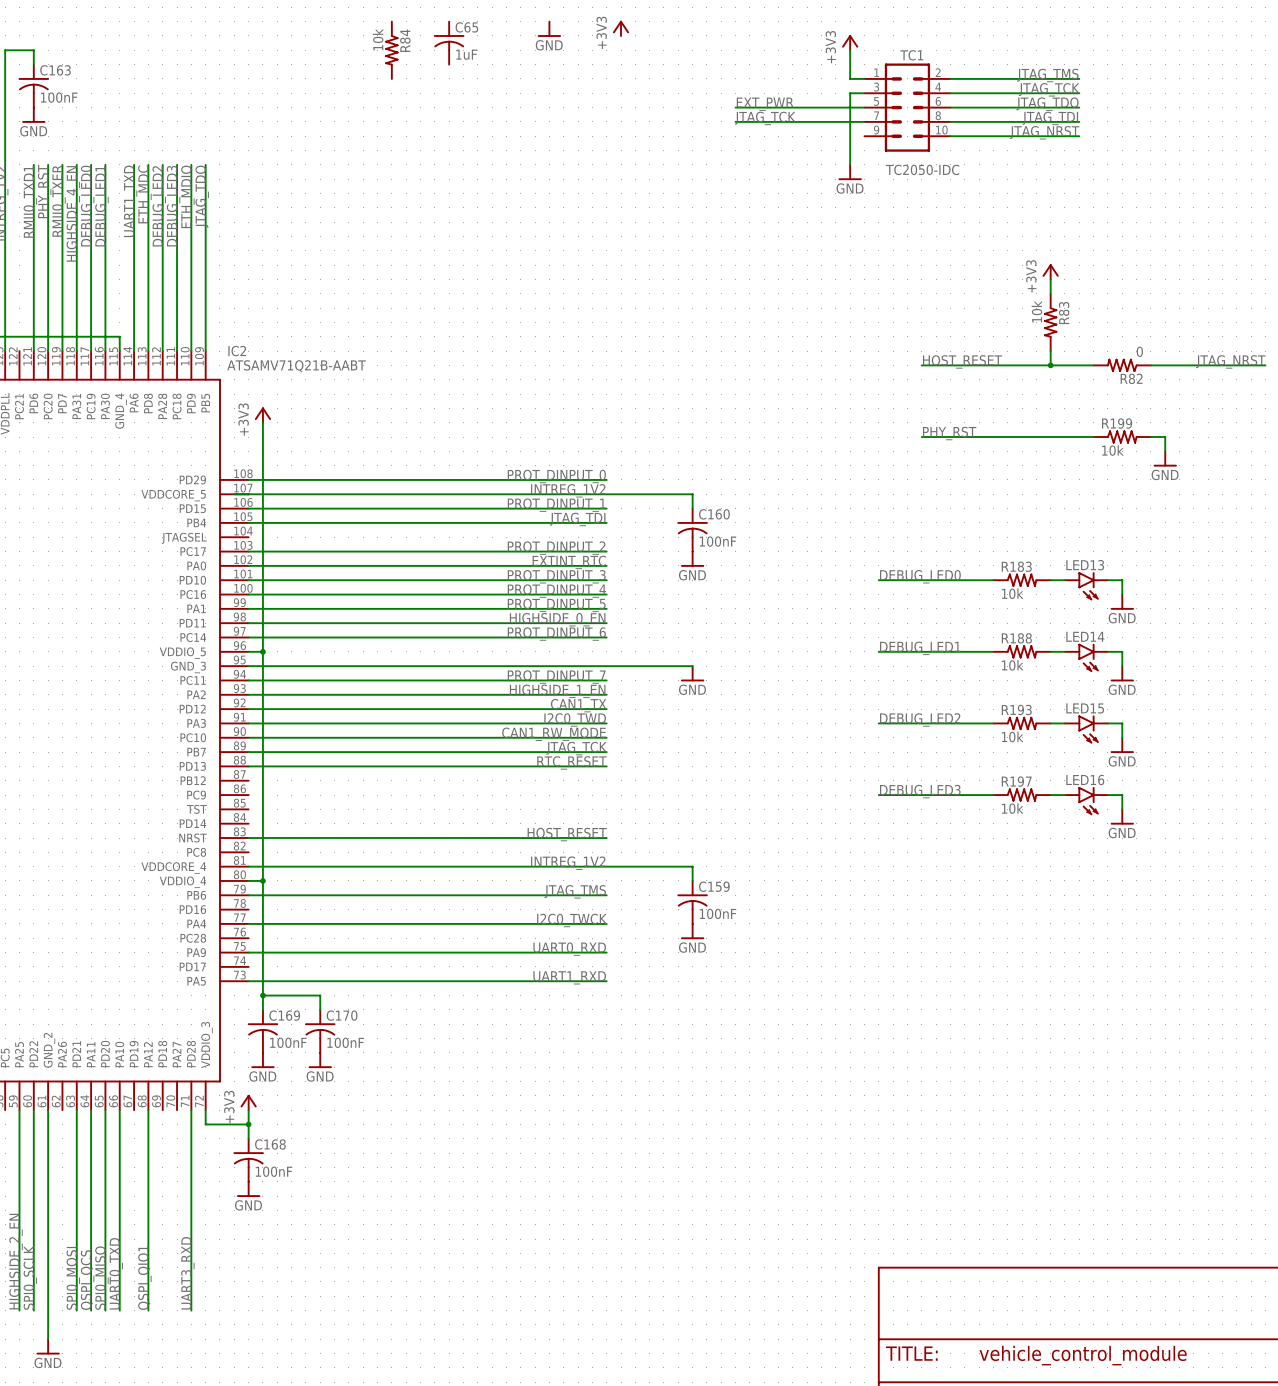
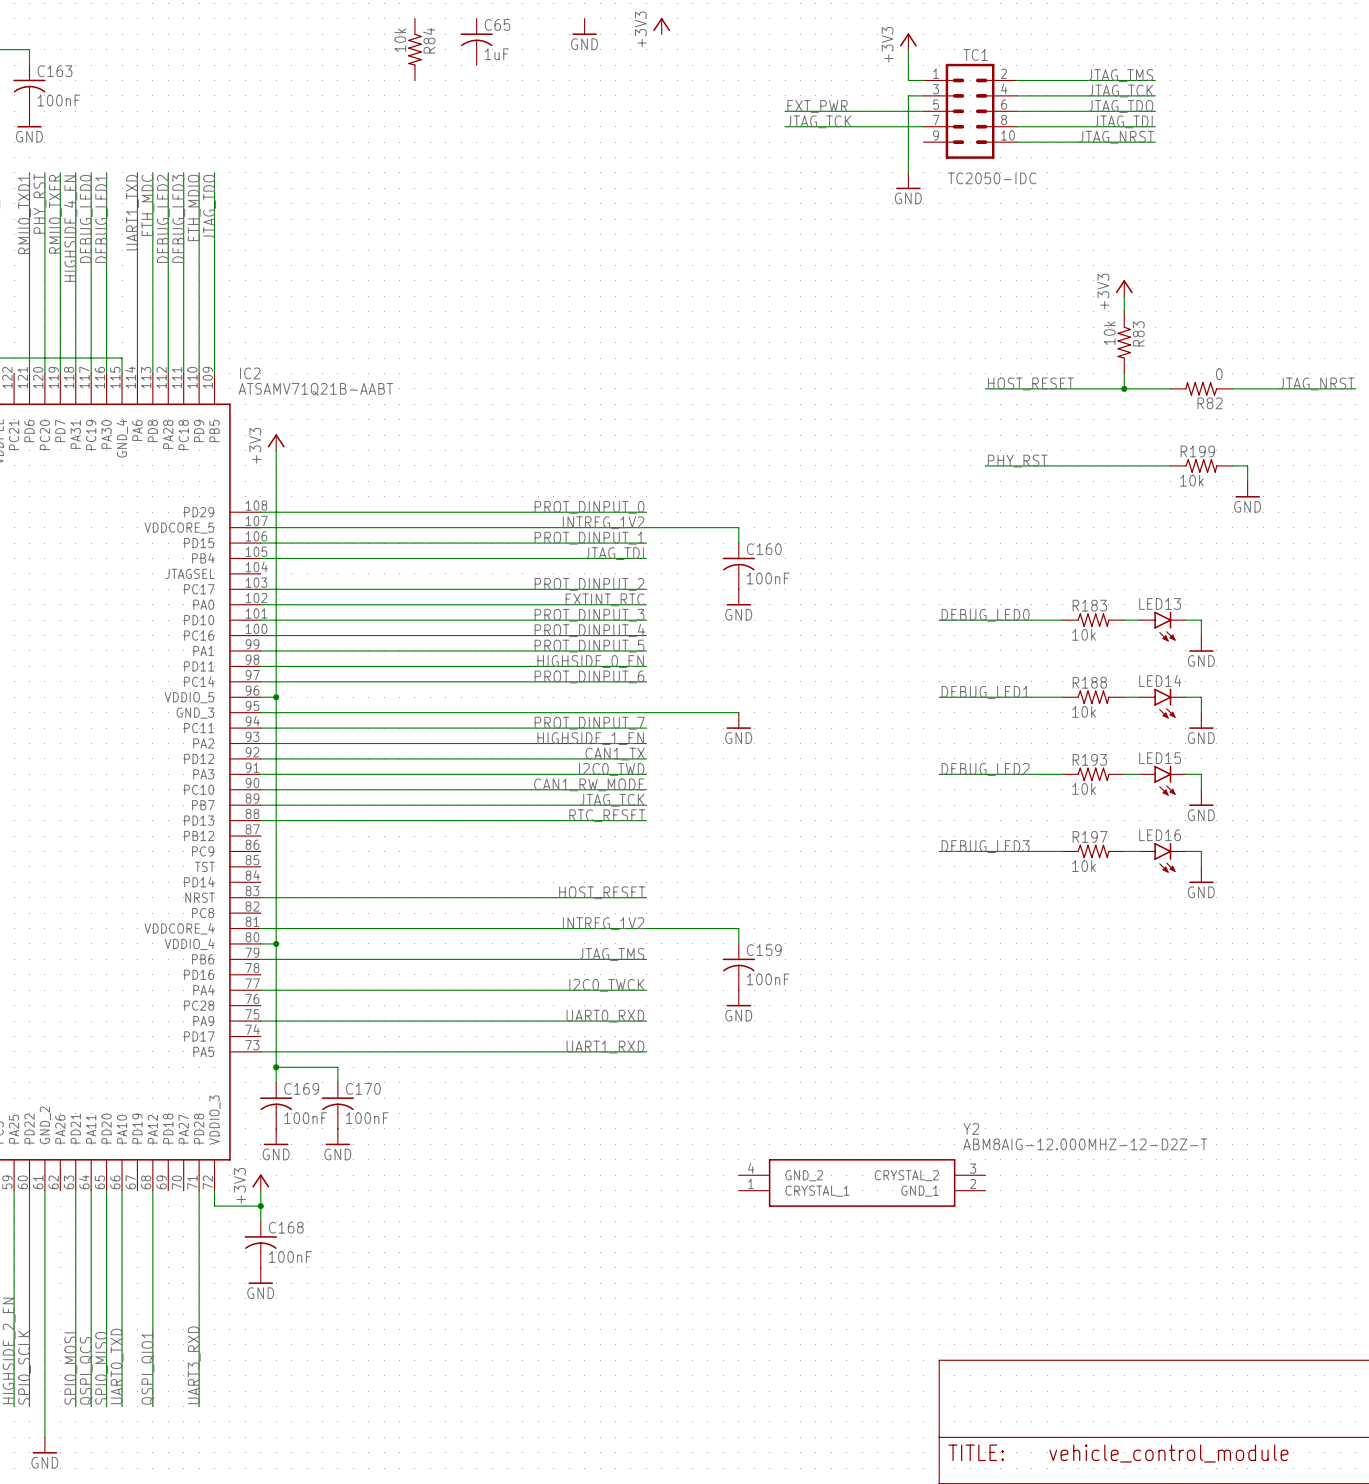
Y2: none -> ABM8AIG-12.000MHZ-12-D2Z-T (862, 1182)

